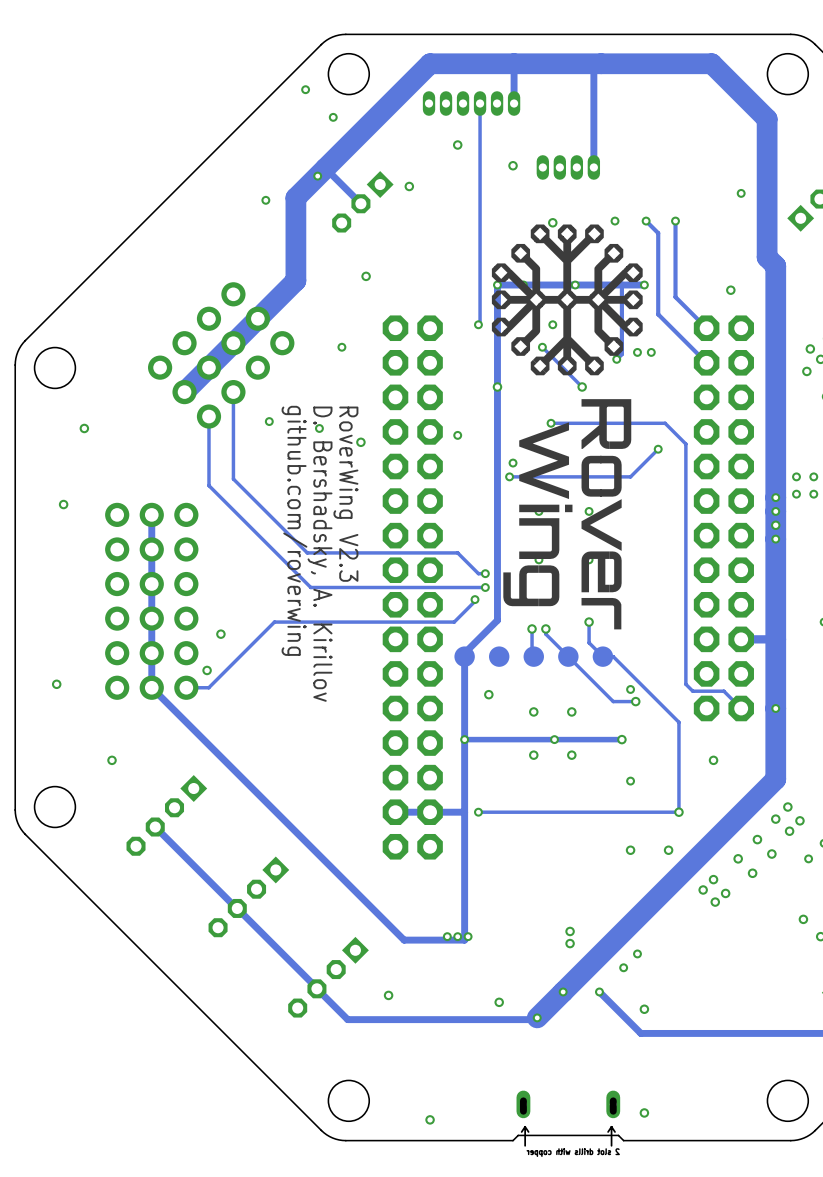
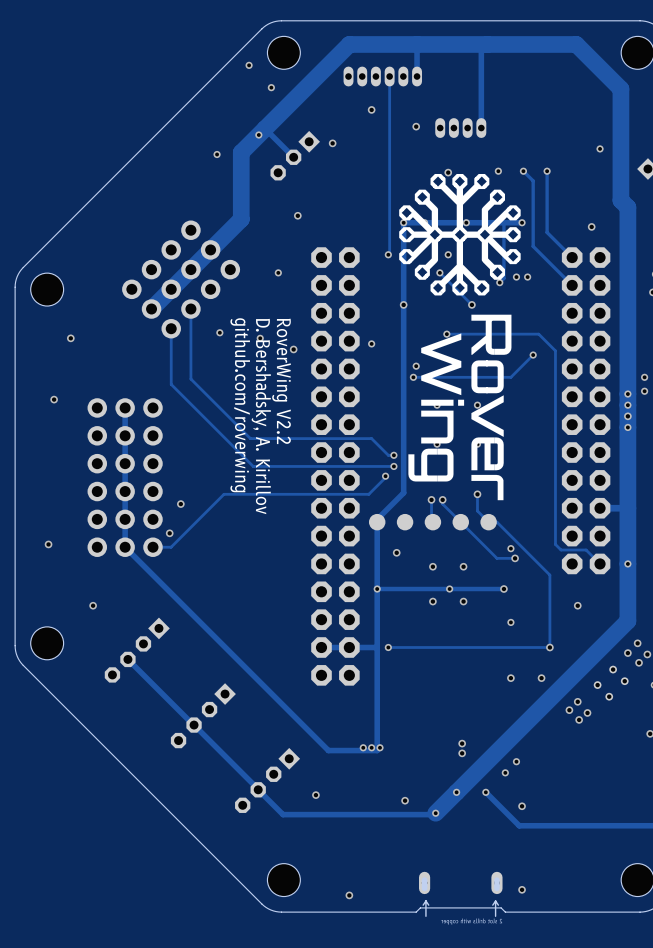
text: RoverWing V2.3 (345, 494) -> RoverWing V2.2 (281, 381)

